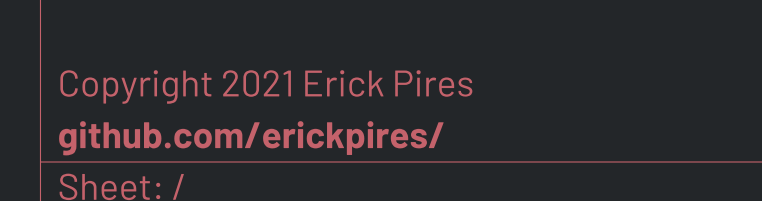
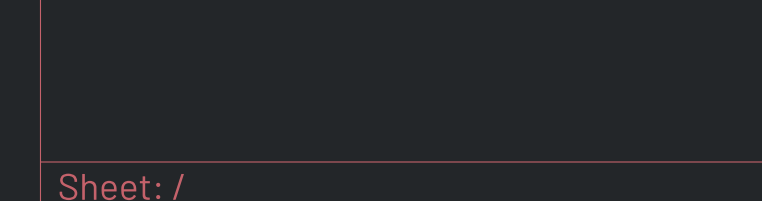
title block: Copyright 2021 Erick Pires (266, 87) -> none
title block: github.com/erickpires/ (251, 138) -> none

